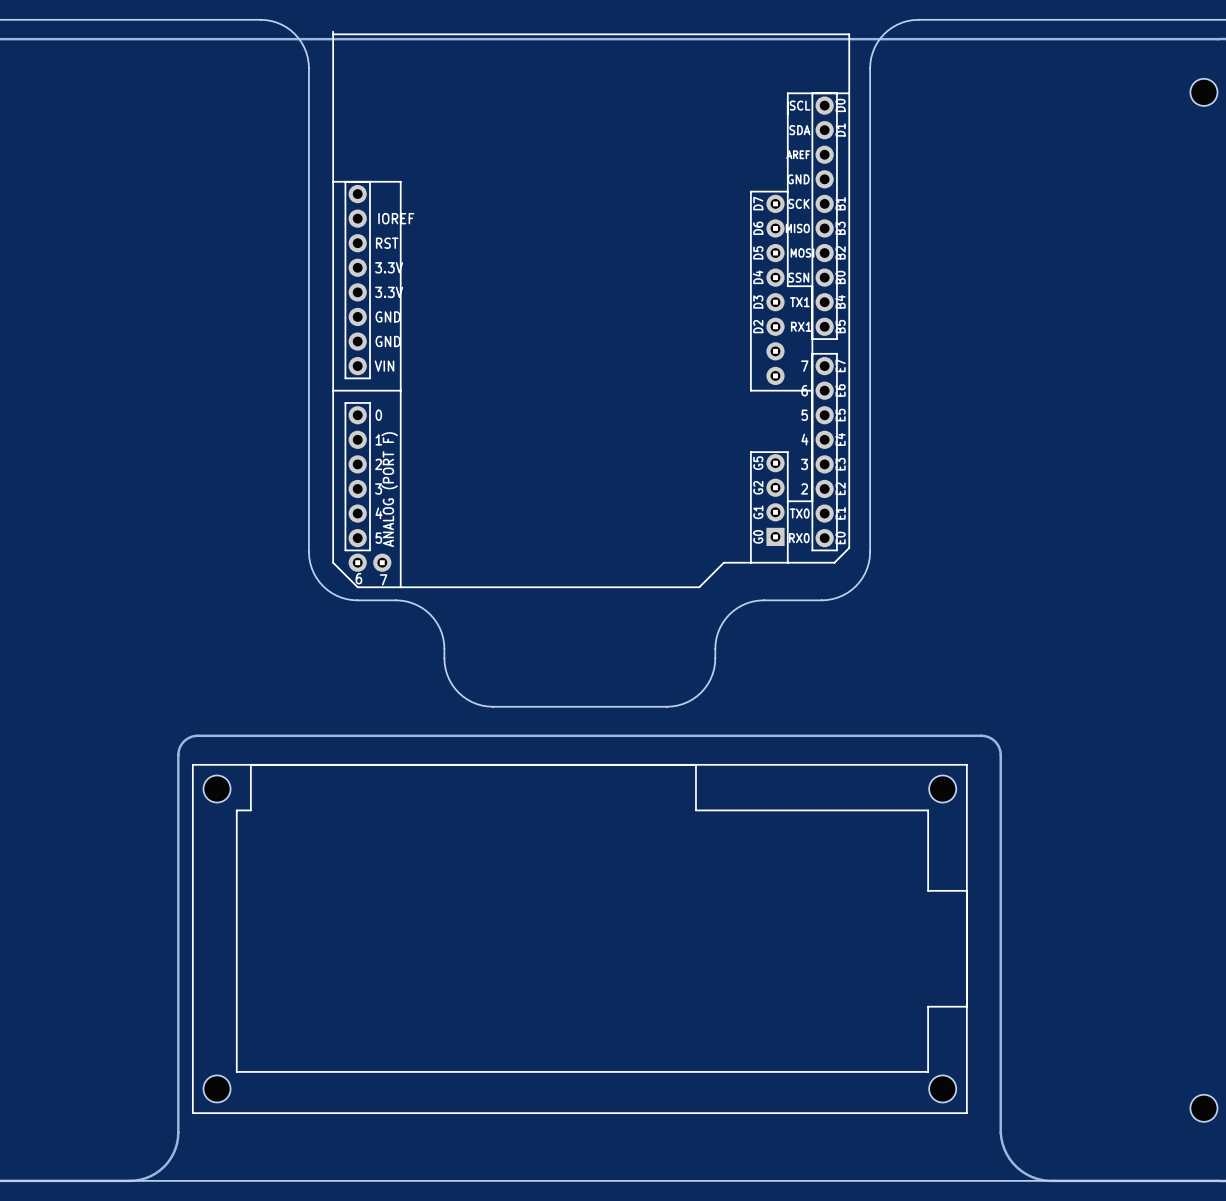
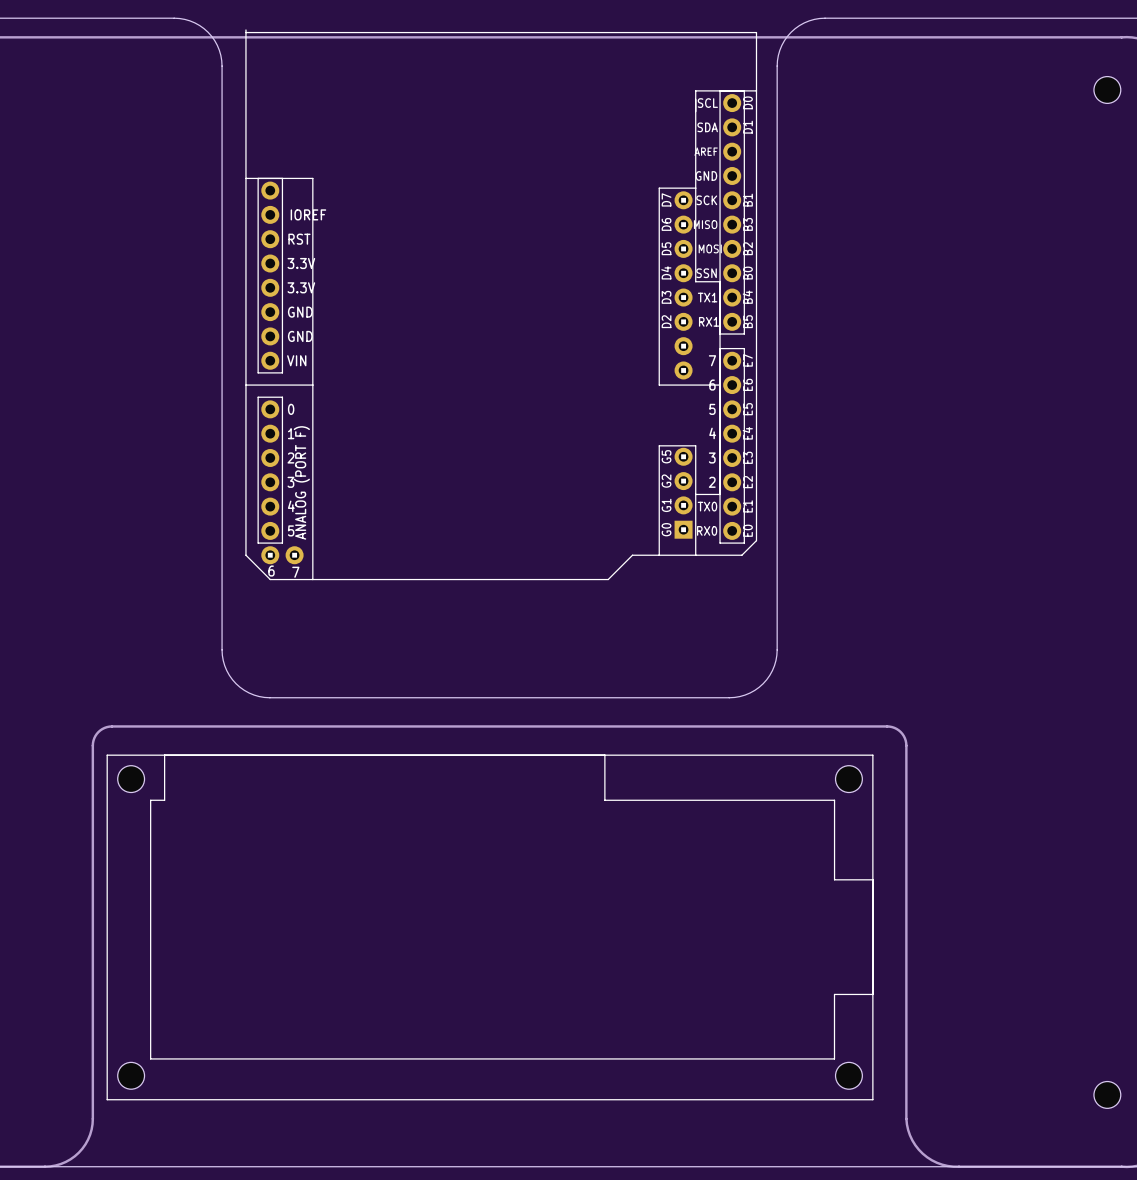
board edge: (308, 551) (311, 567) (316, 577) (327, 589) (336, 595) (351, 600) (406, 601) (426, 610) (433, 618) (441, 632) (445, 669) (451, 684) (467, 699) (476, 704) (492, 706) -> (222, 544) (222, 655) (229, 675) (240, 687) (254, 695) (264, 697) (403, 697)
board edge: (870, 551) (867, 567) (862, 577) (851, 589) (842, 595) (827, 600) (758, 600) (747, 603) (733, 610) (725, 618) (718, 632) (714, 669) (707, 684) (692, 699) (682, 704) (666, 706) -> (777, 544) (776, 655) (769, 675) (759, 687) (745, 695) (734, 697) (576, 697)

